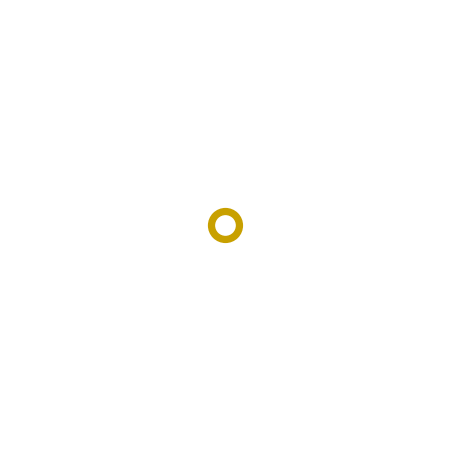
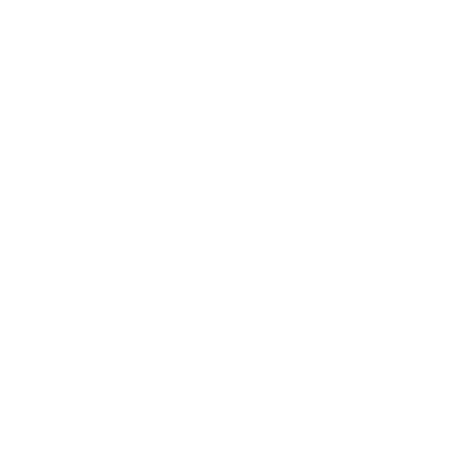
part: (225, 225) -> none

